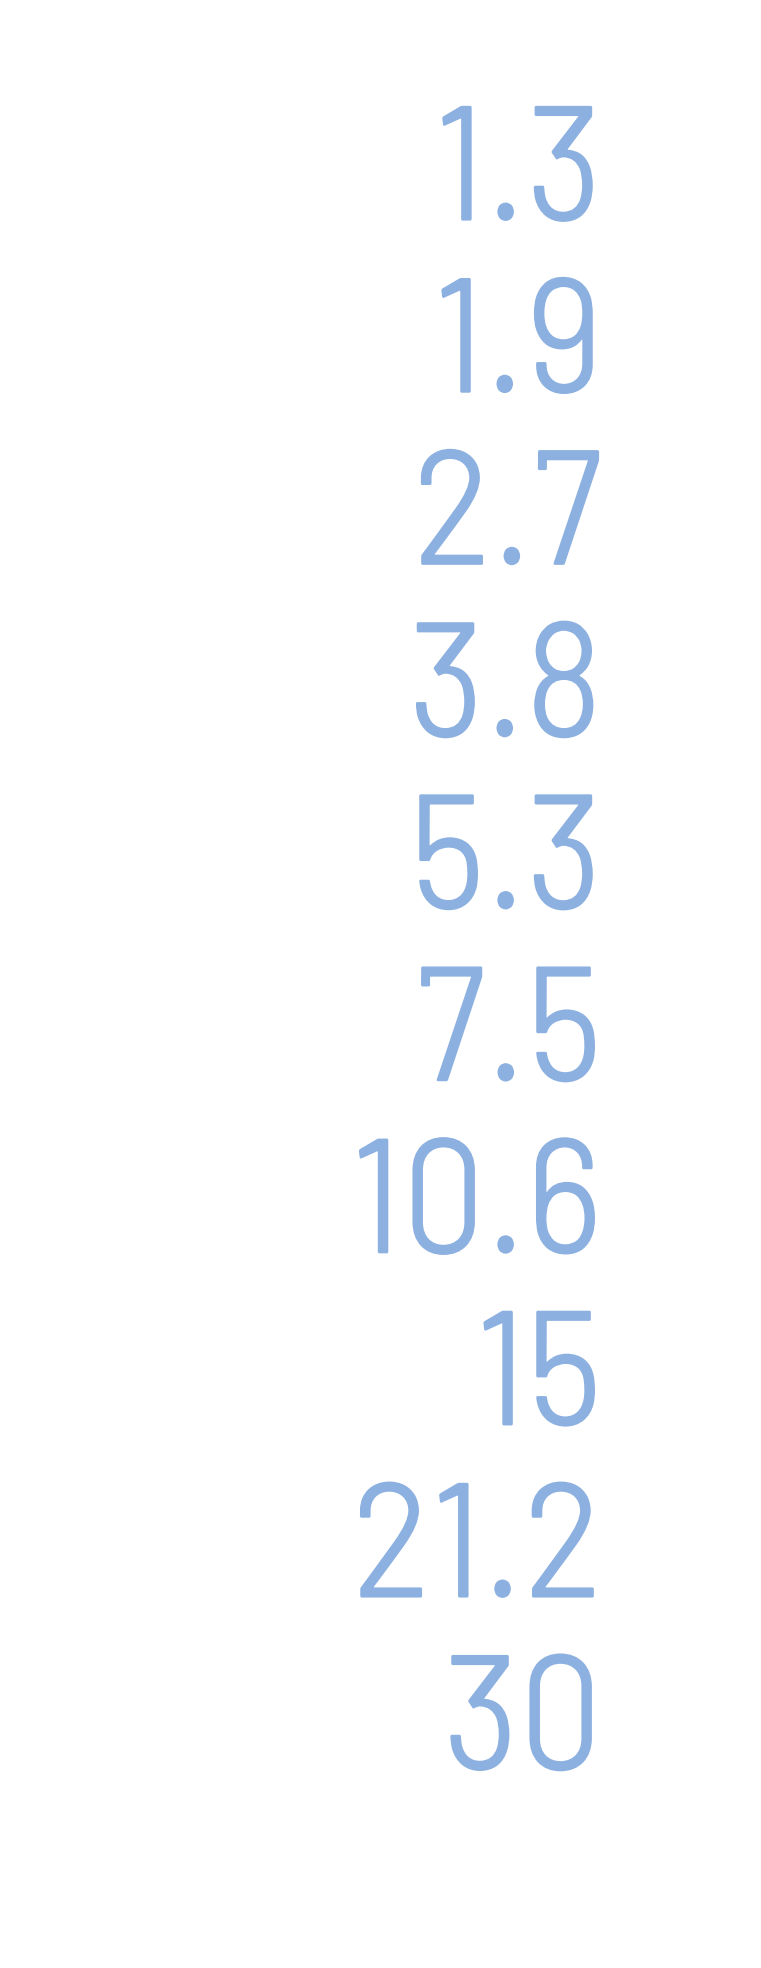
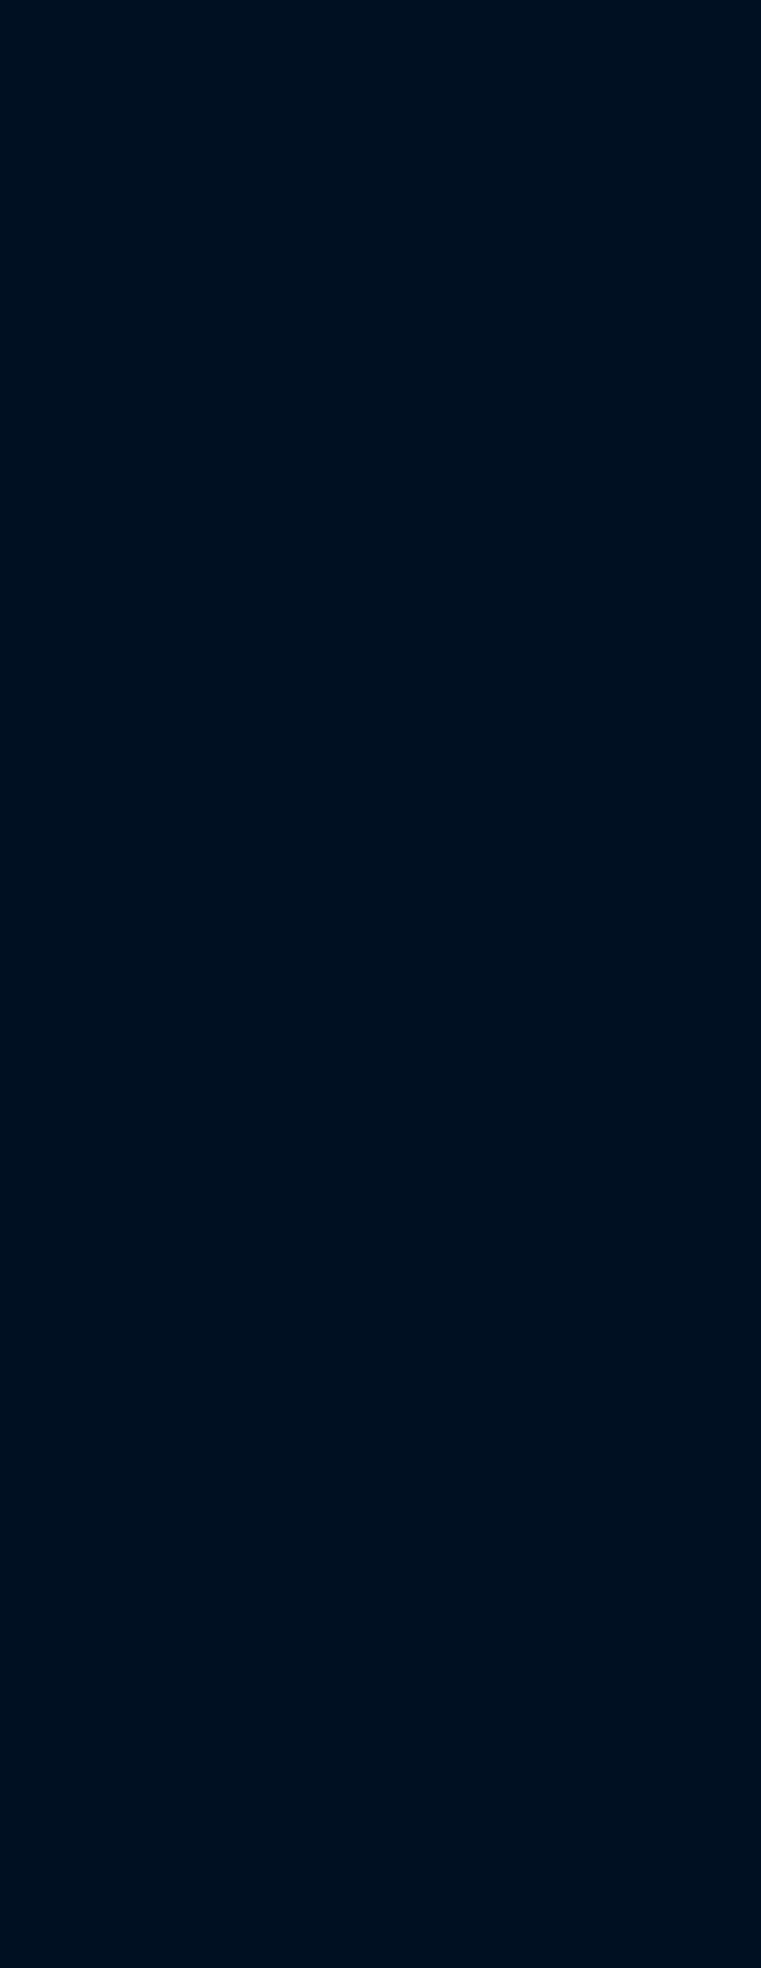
text: 1.3 (517, 163) -> none
text: 1.9 (517, 335) -> none
text: 2.7 (509, 506) -> none
text: 3.8 (504, 679) -> none
text: 5.3 (506, 852) -> none
text: 7.5 (508, 1024) -> none
text: 10.6 (476, 1196) -> none
text: 15 (539, 1368) -> none
text: 21.2 (476, 1539) -> none
text: 30 (521, 1712) -> none

